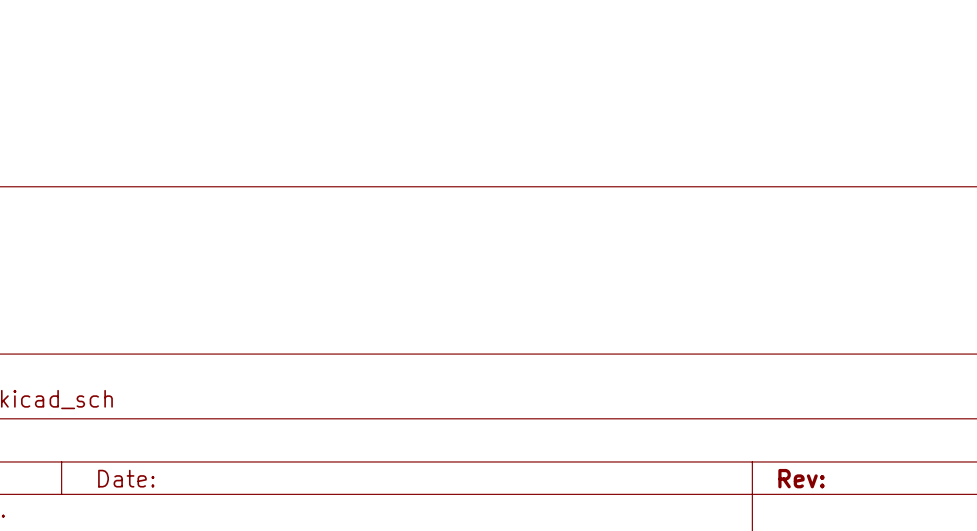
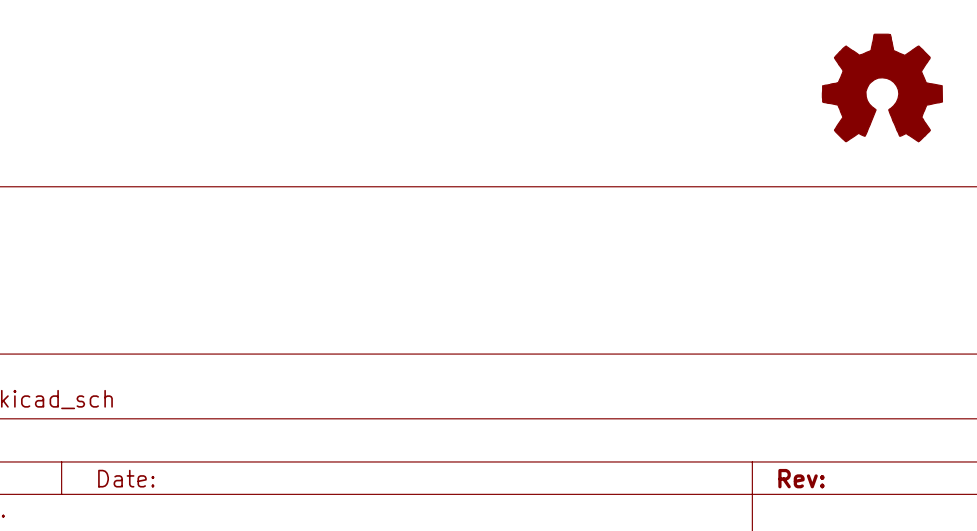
part: none -> (882, 87)

